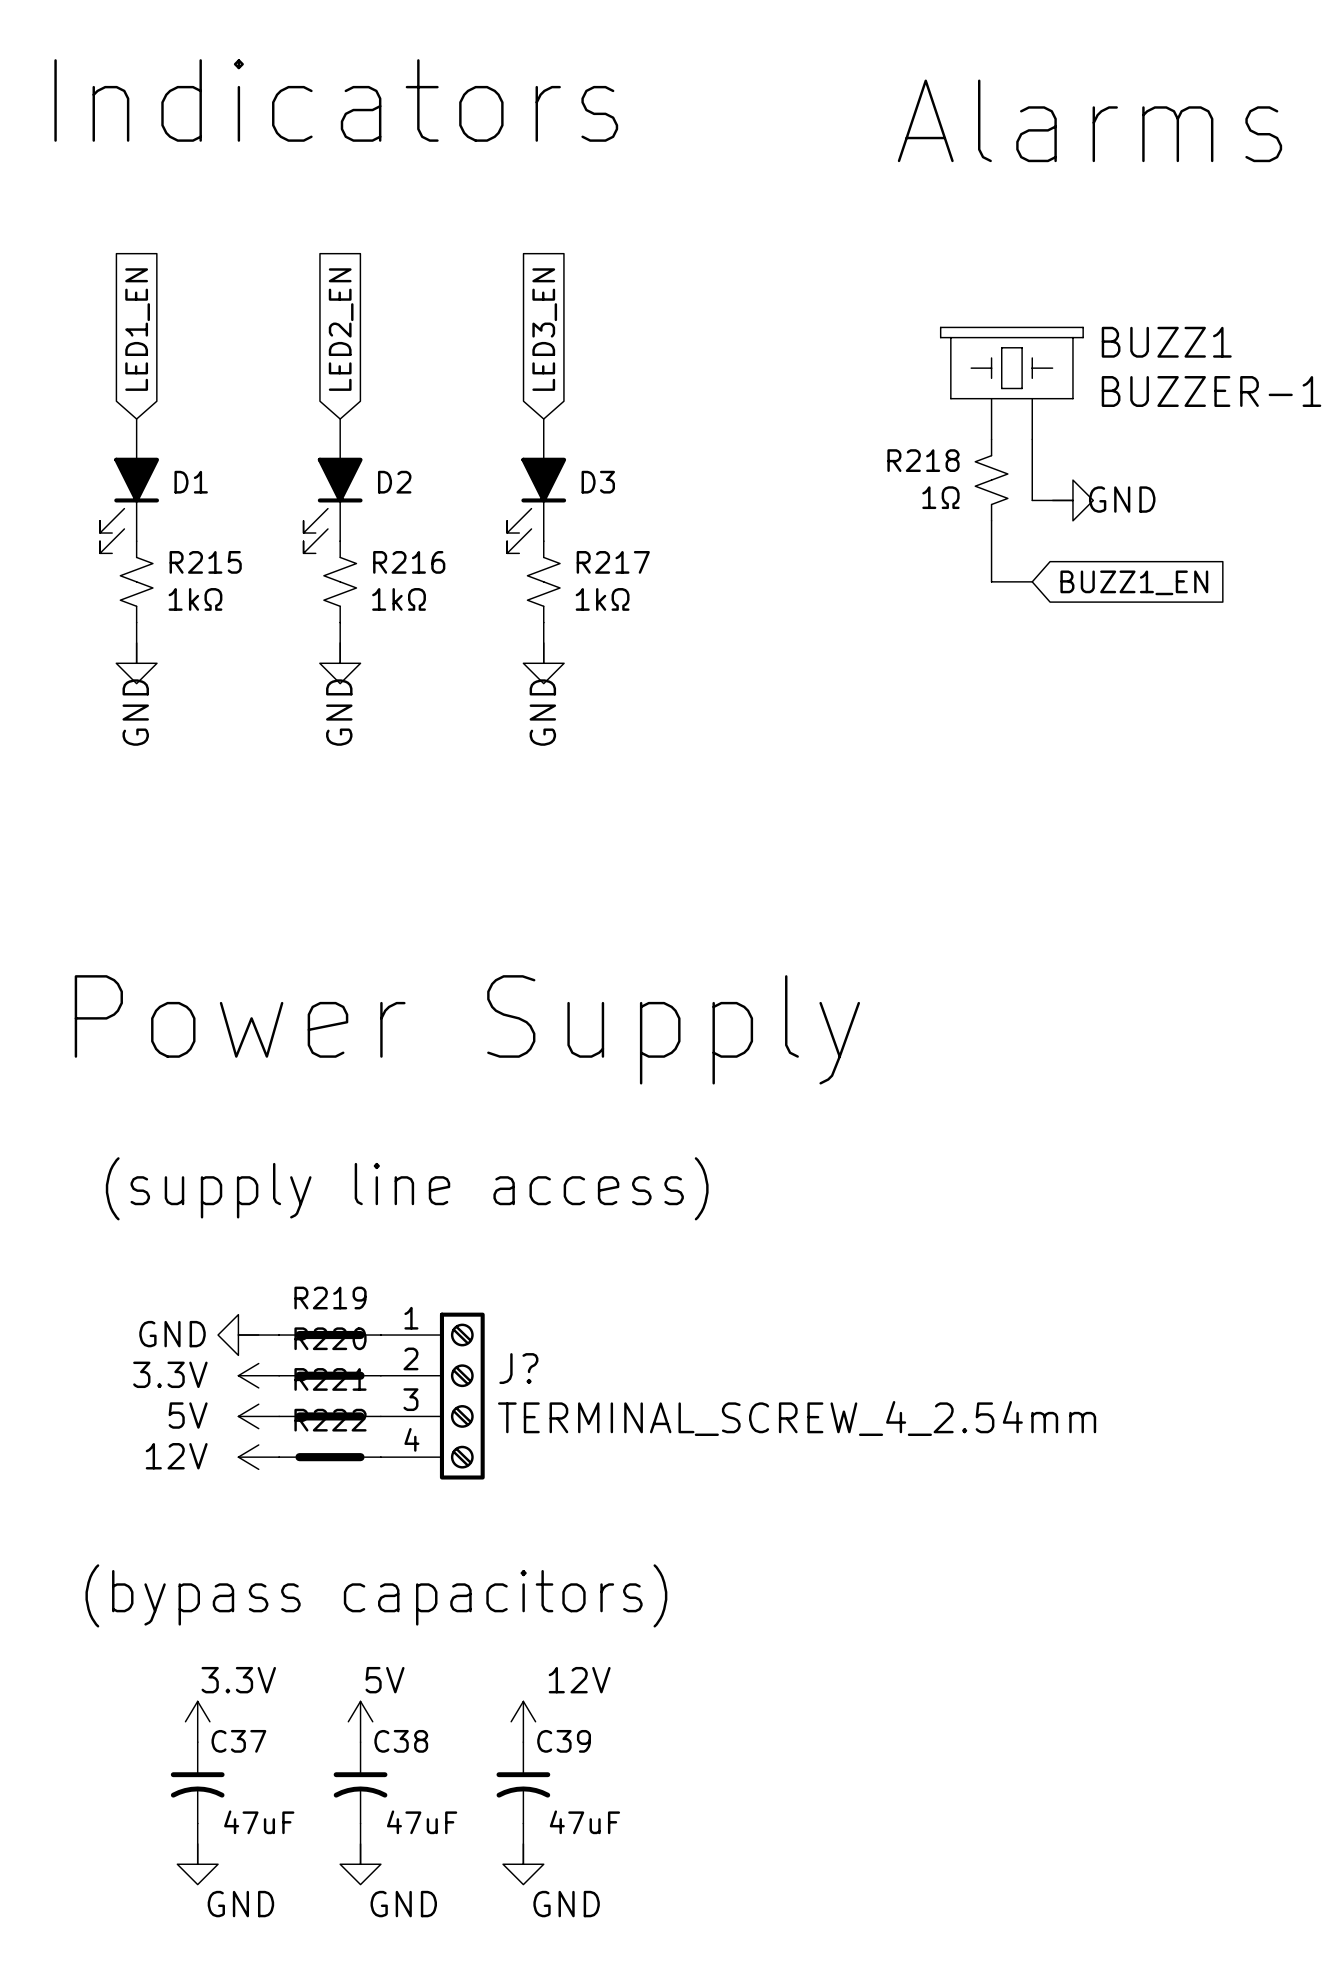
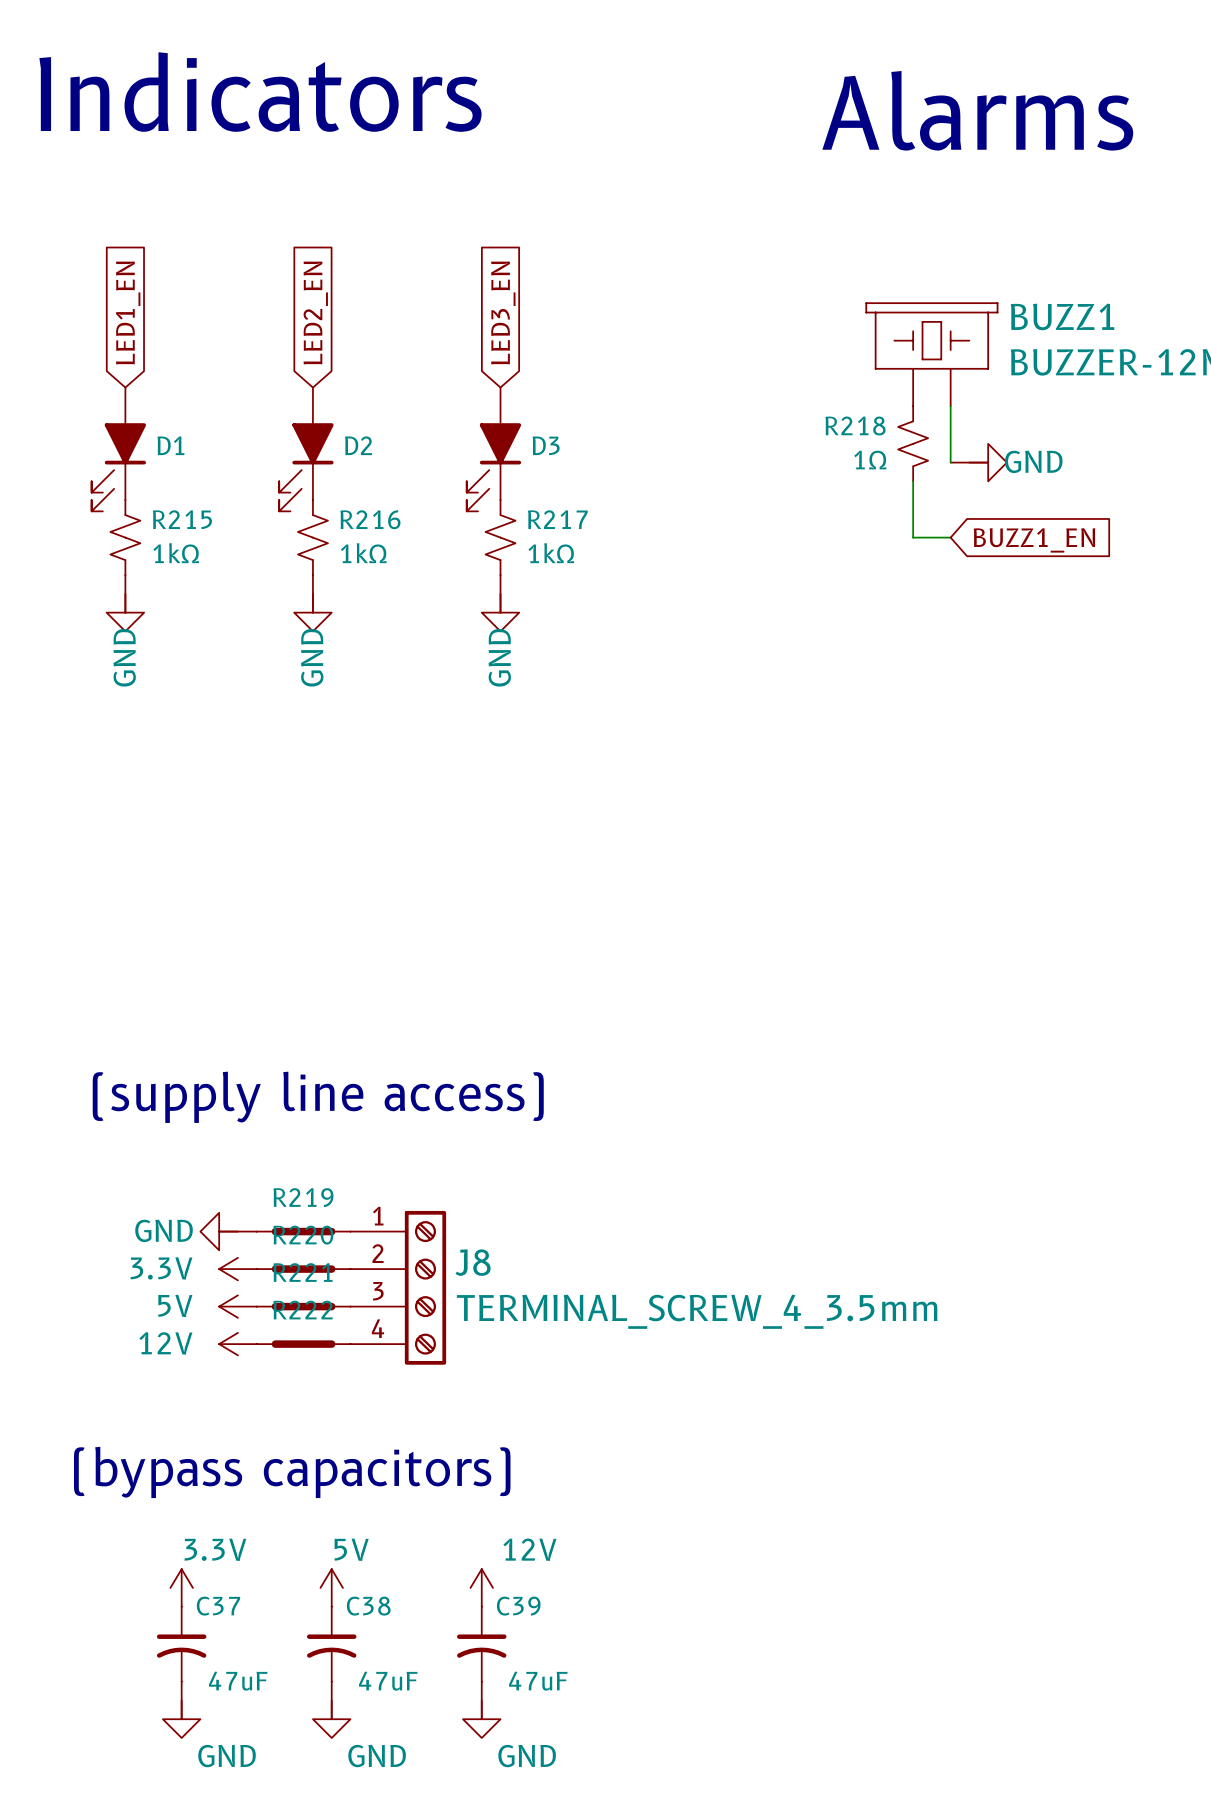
text: Power Supply (467, 1029) -> none
J? name: J? (518, 1368) -> J8 (473, 1262)
J? value: TERMINAL_SCREW_4_2.54mm (797, 1418) -> TERMINAL_SCREW_4_3.5mm (697, 1311)

